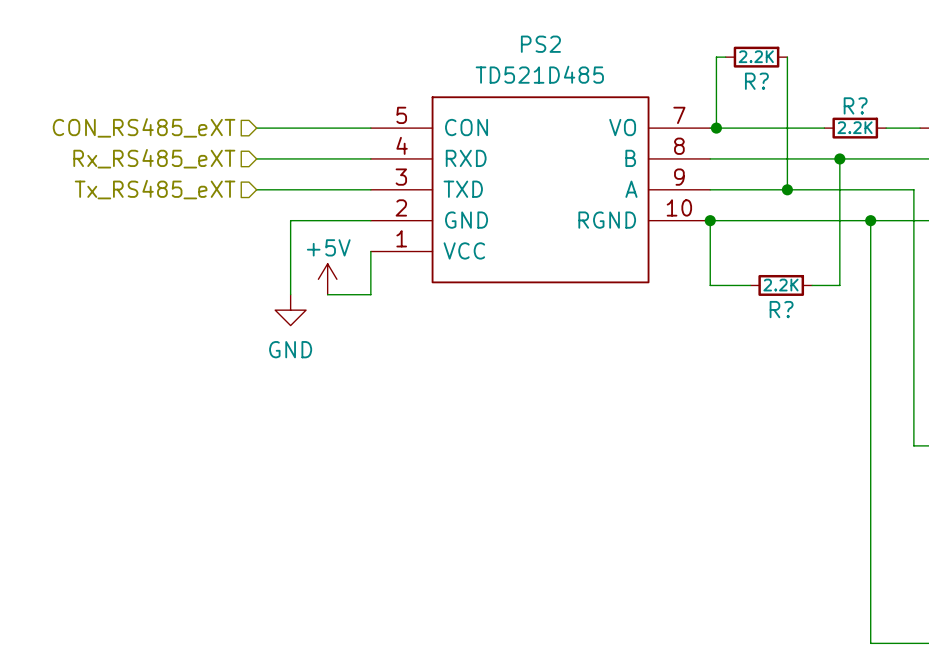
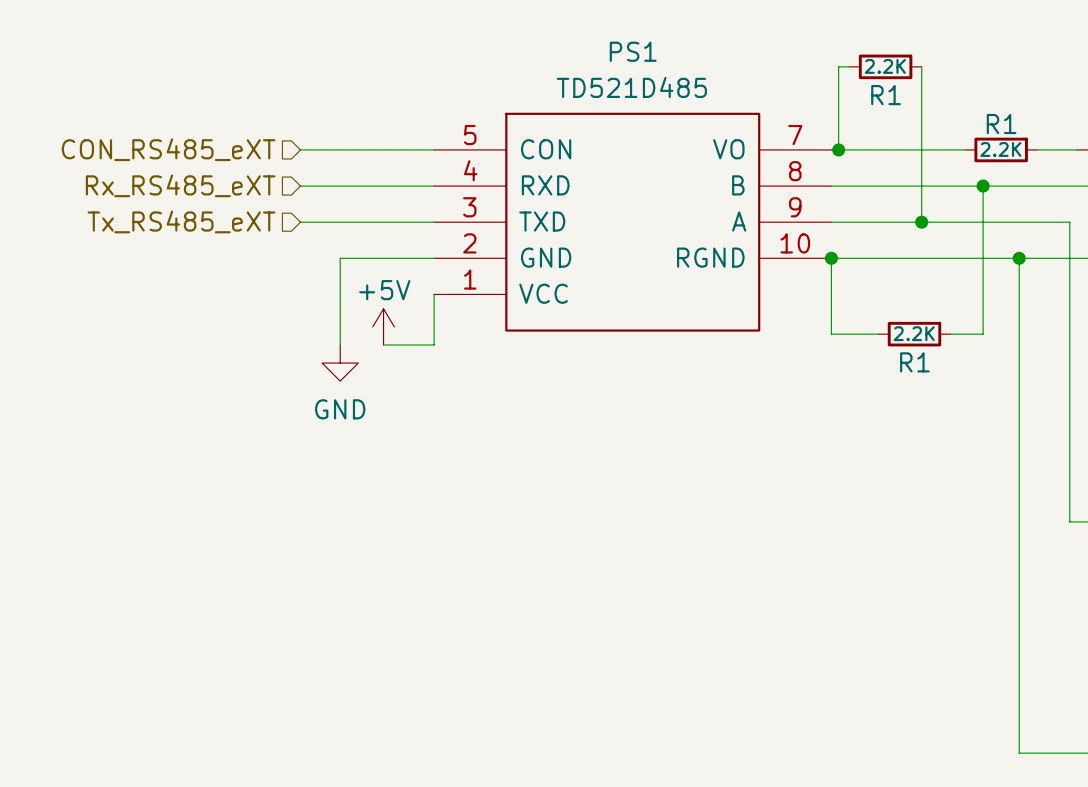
PS2 name: PS2 (540, 44) -> PS1 (633, 51)
R? name: R? (756, 81) -> R1 (886, 95)
R? name: R? (855, 105) -> R1 (1001, 123)
R? name: R? (781, 309) -> R1 (914, 362)

